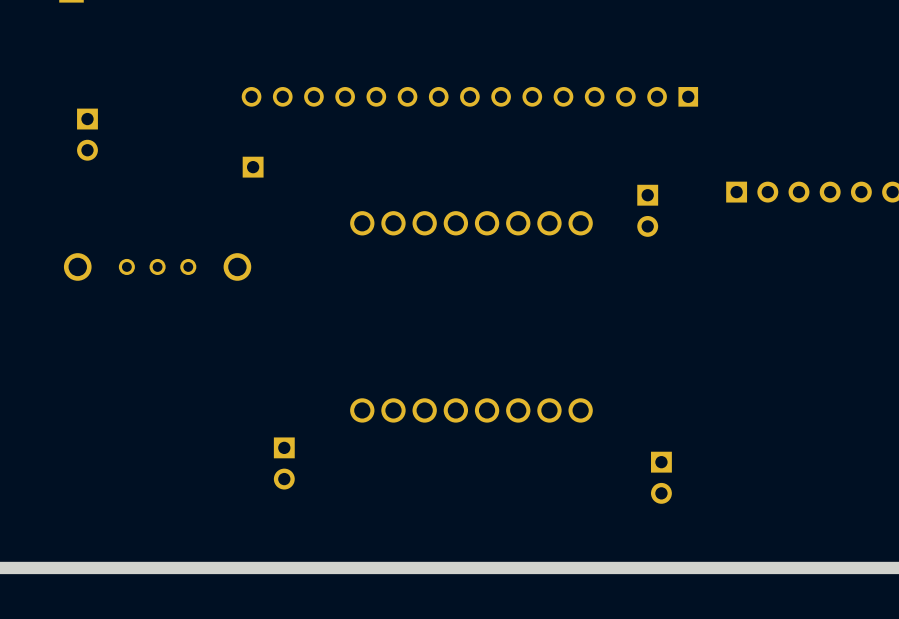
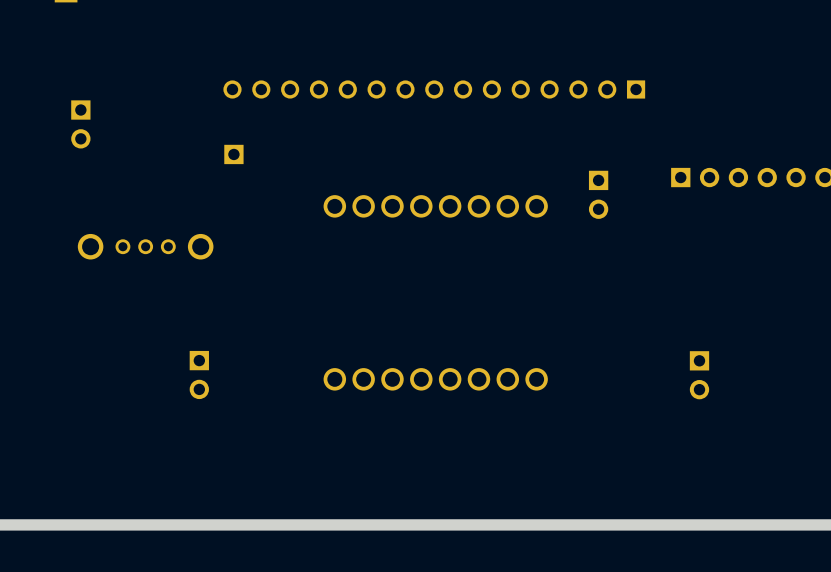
part footprint: [63, 253, 252, 281] -> [77, 233, 214, 260]
part position: (284, 463) -> (199, 375)
part position: (661, 477) -> (699, 375)

